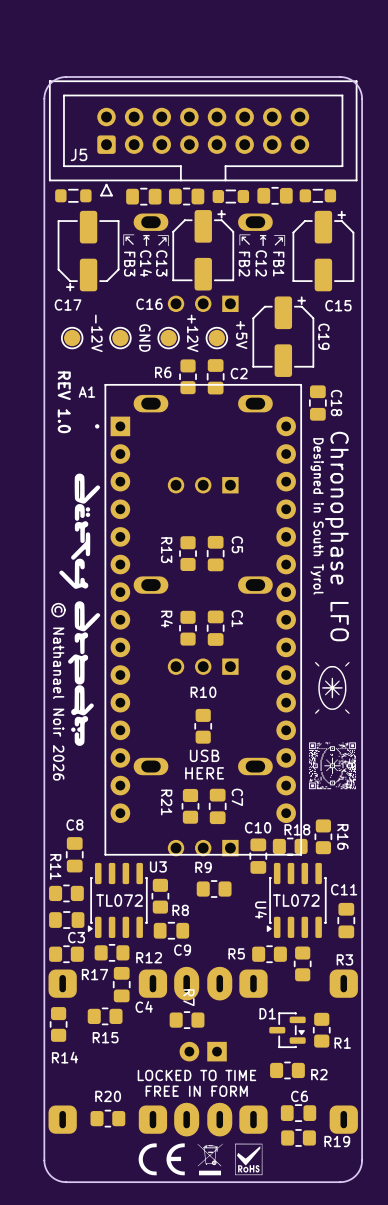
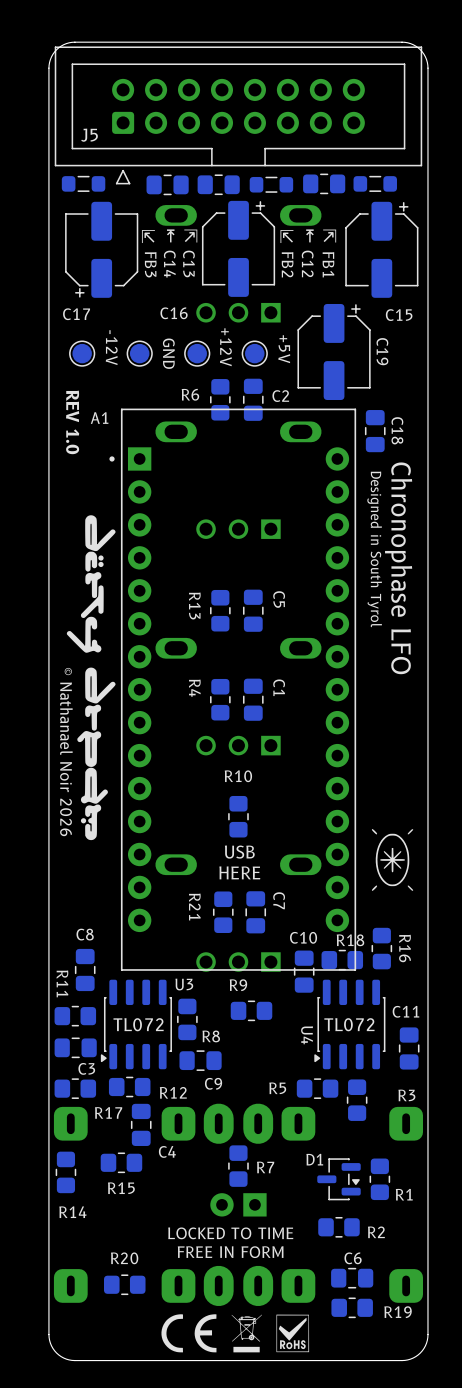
drawing position: (332, 687) -> (392, 859)
drawing: [309, 742, 356, 790] -> none
R7 rotation: 0° (187, 1020) -> 90° clockwise (238, 1166)

